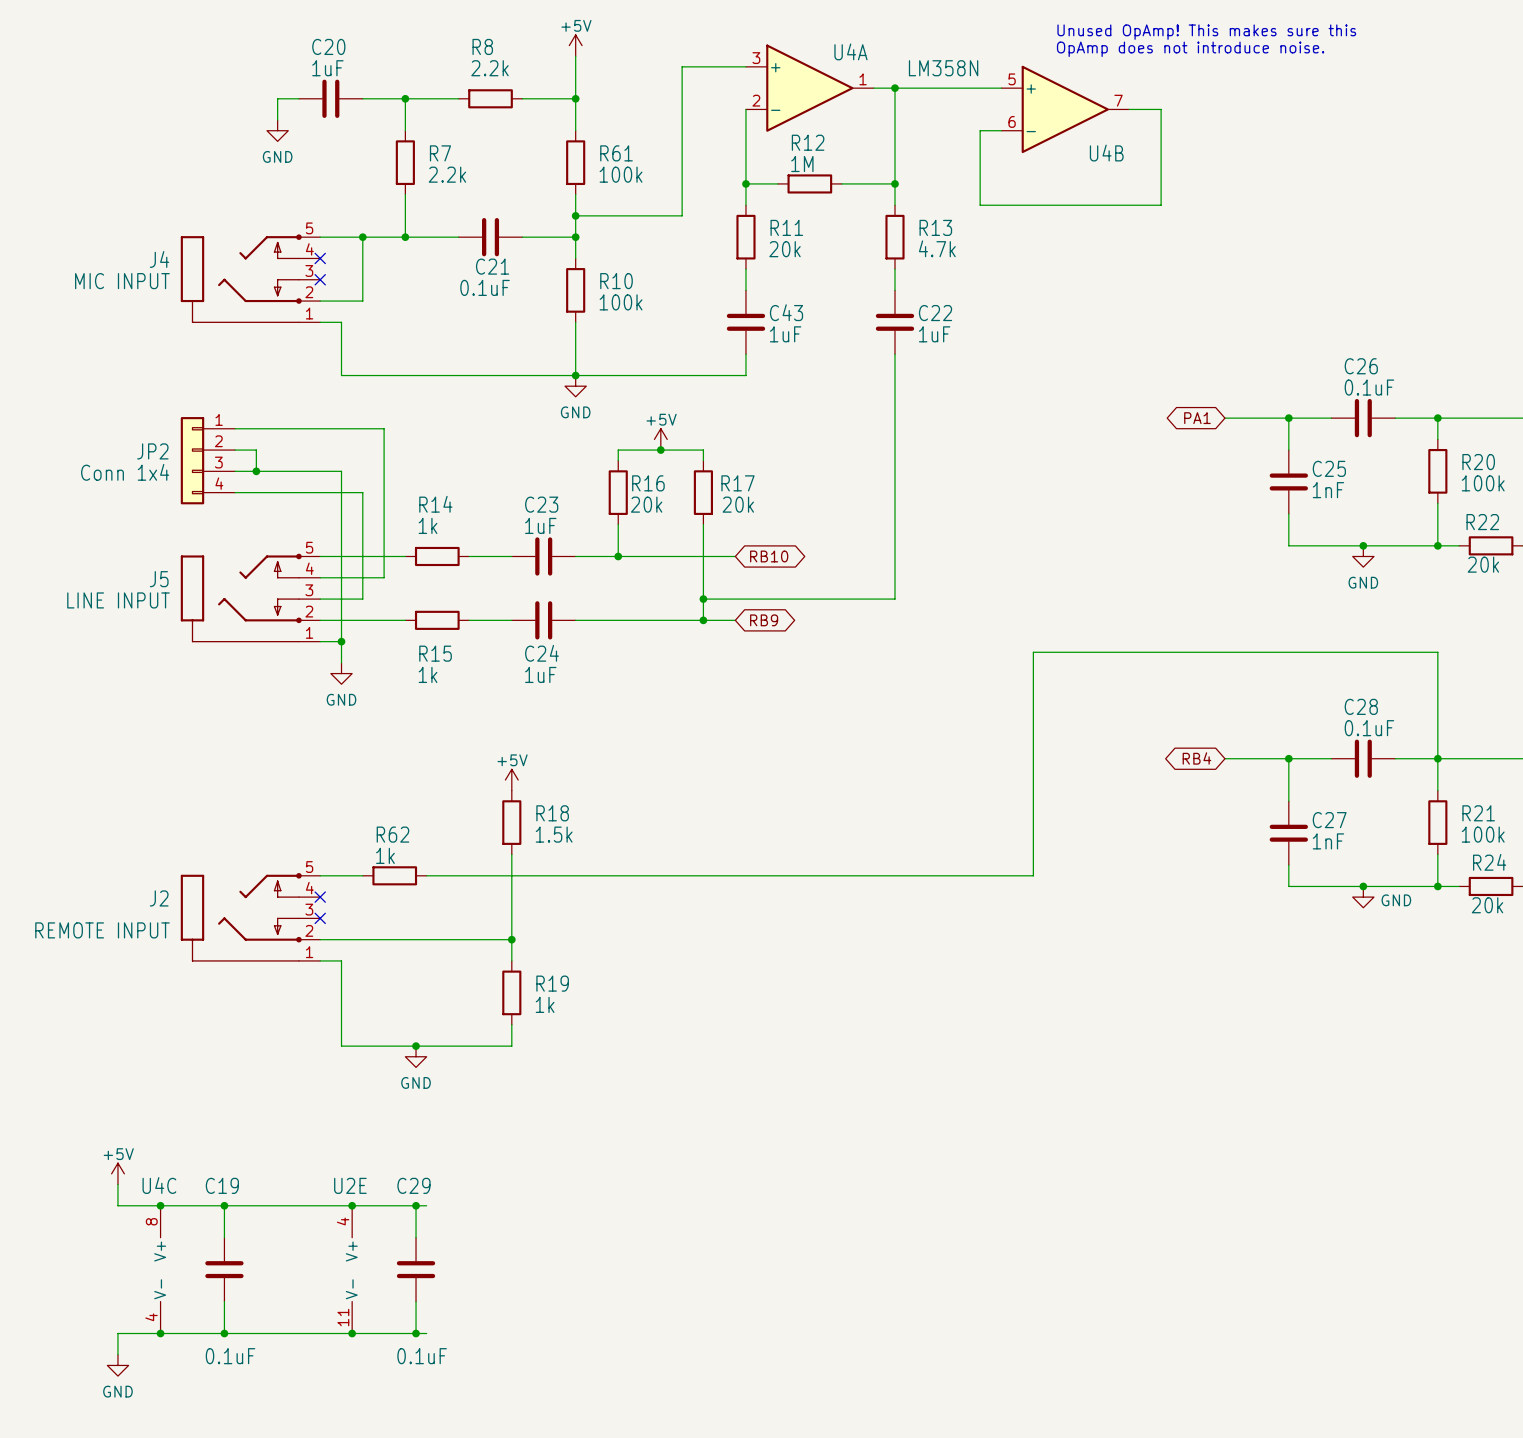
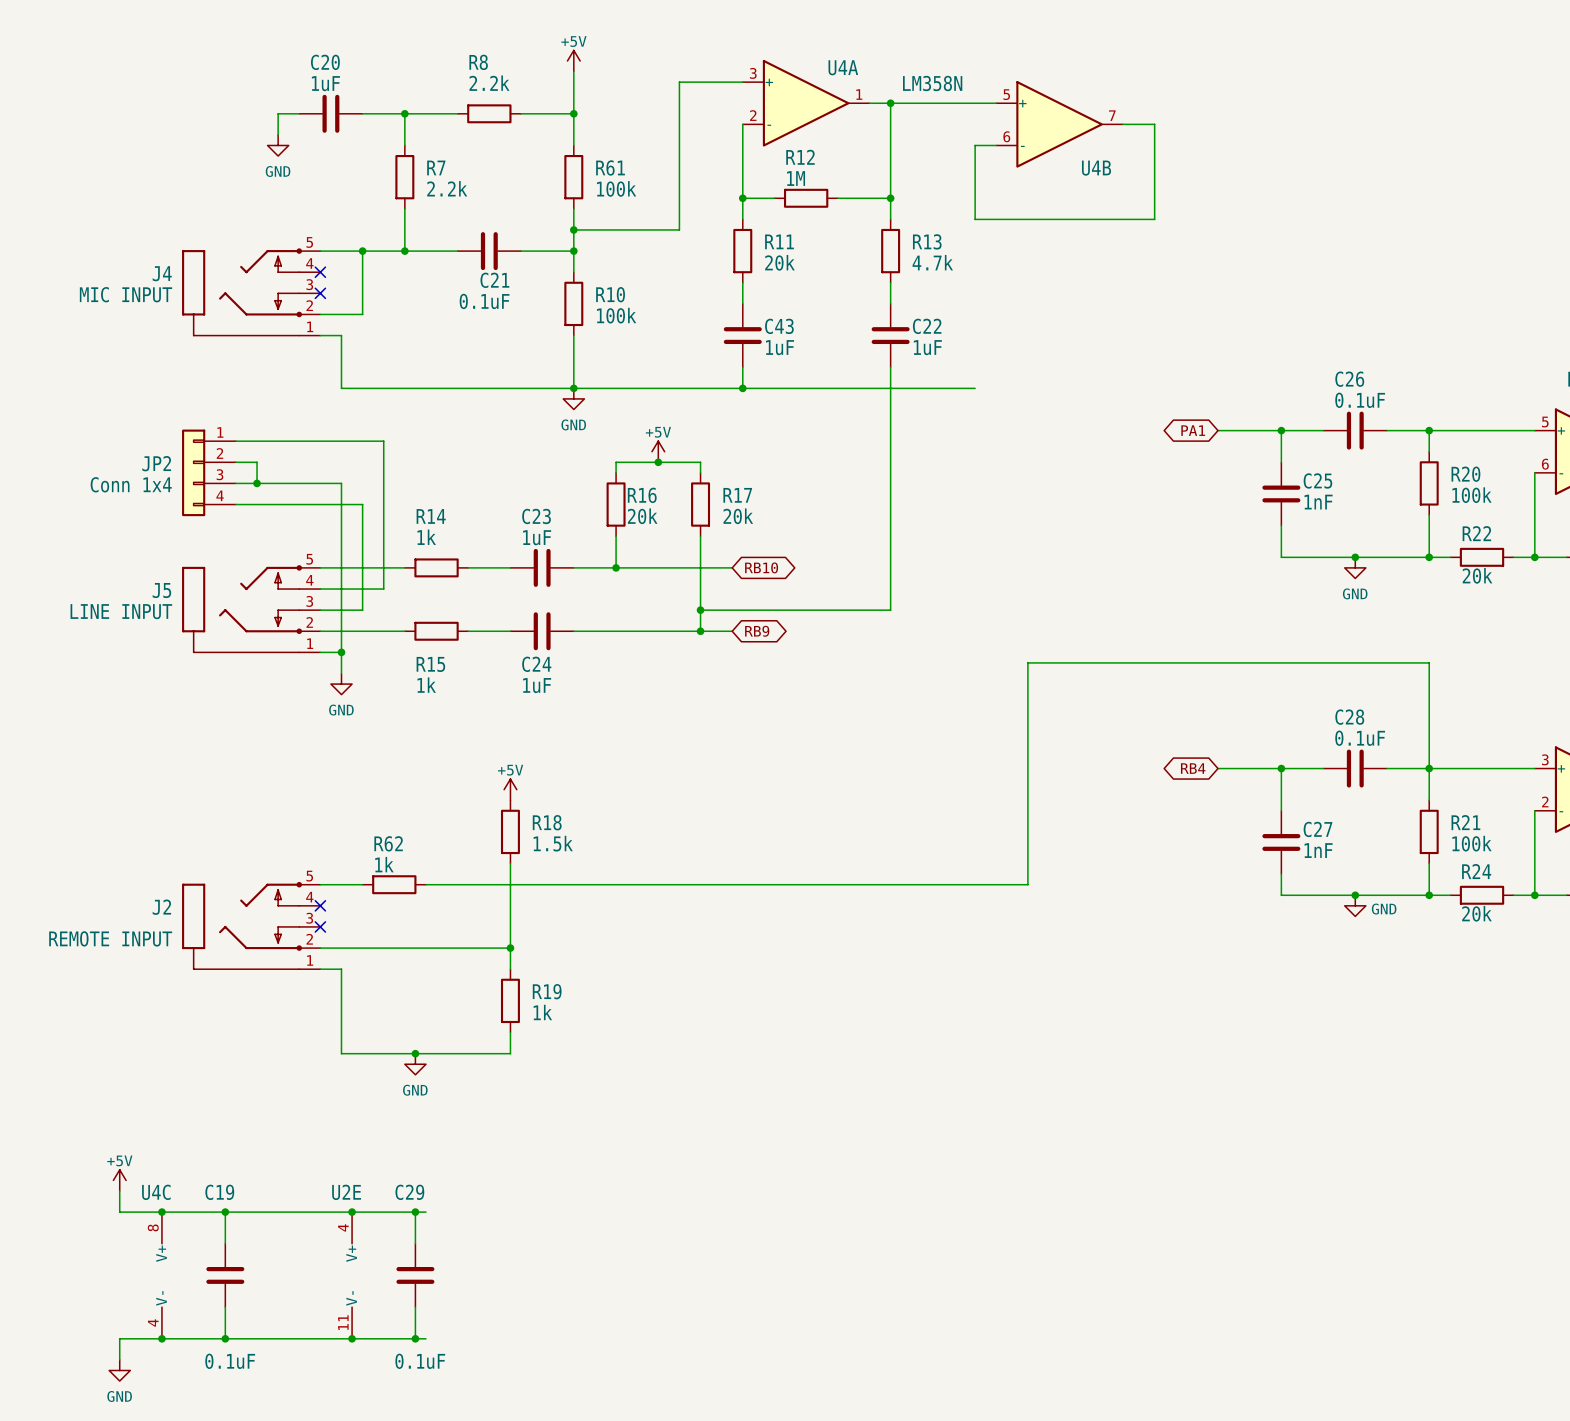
text: Unused OpAmp! This makes sure this (1206, 32) -> none
text: OpAmp does not introduce noise. (1190, 49) -> none
wire: none -> (742, 388) (975, 388)
junction: none -> (742, 388)

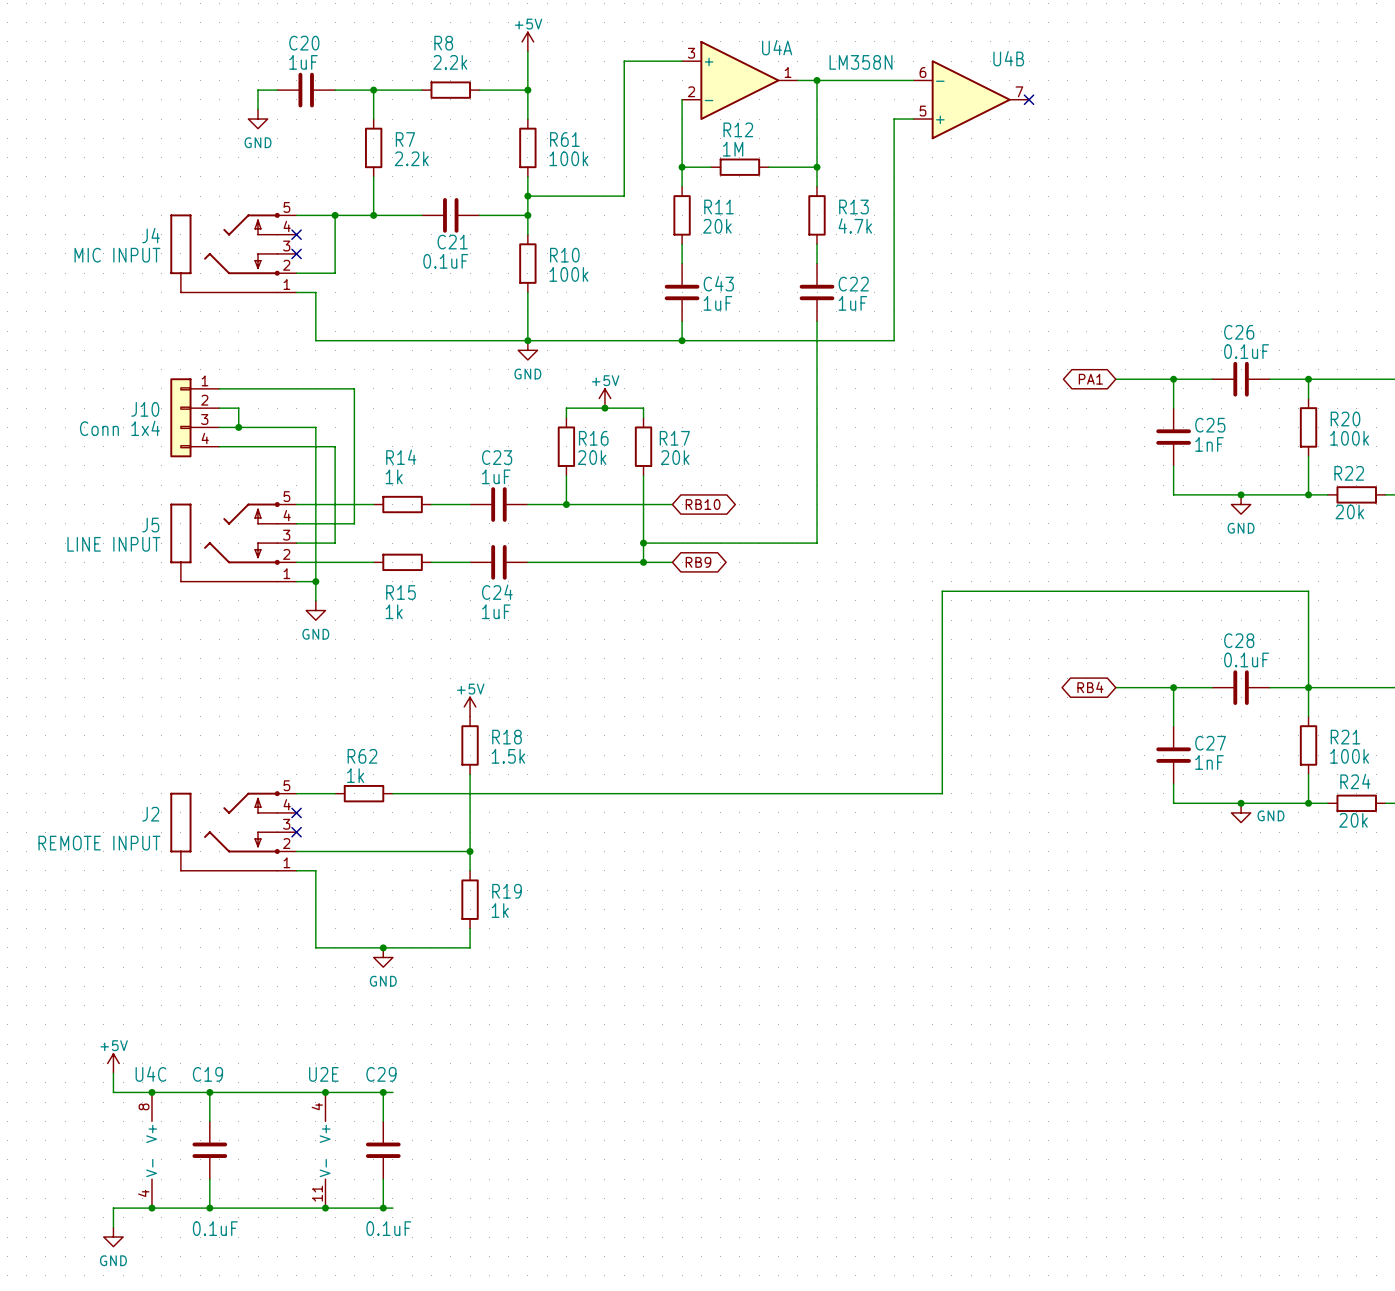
U4B flip: as is (1059, 124) -> up-down (971, 99)
wire: (1122, 124) (1154, 124) (1154, 219) (975, 219) -> (894, 340) (894, 186)
no-connect mark: none -> (1029, 99)
JP2 name: JP2 (156, 463) -> J10 (145, 409)

